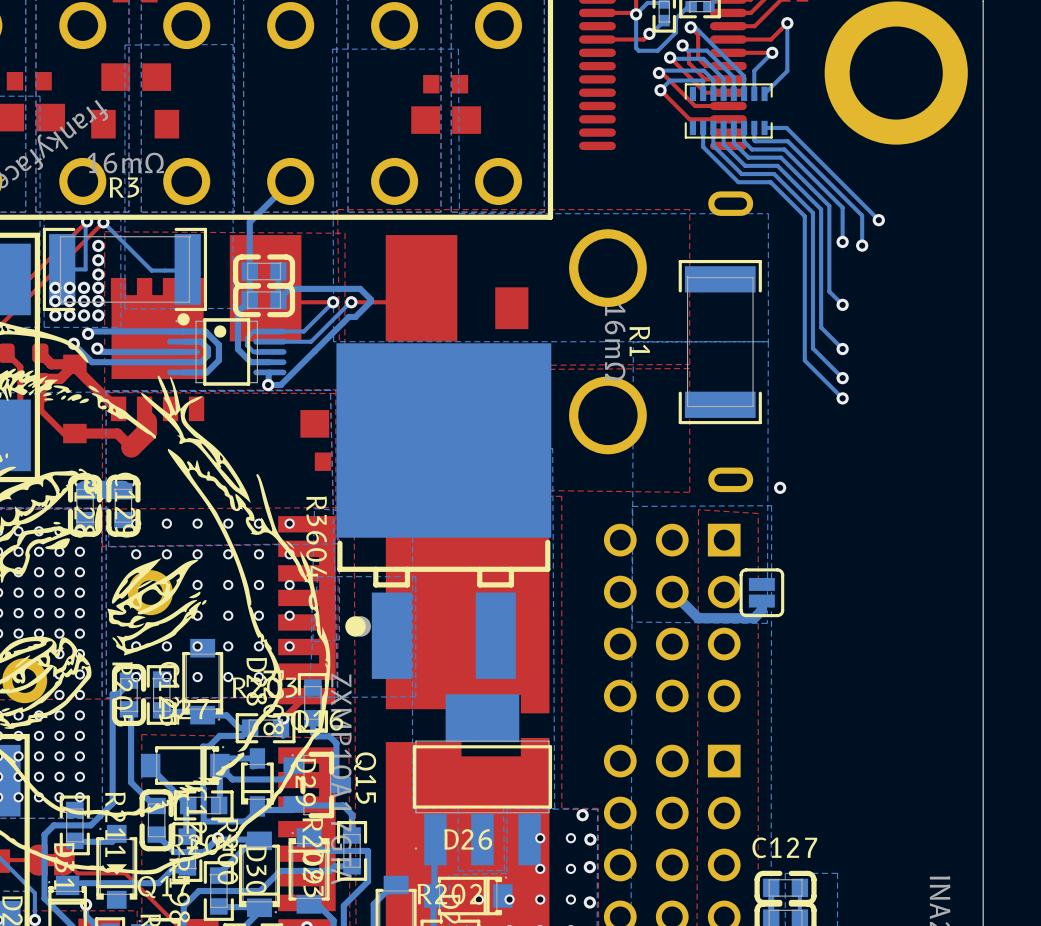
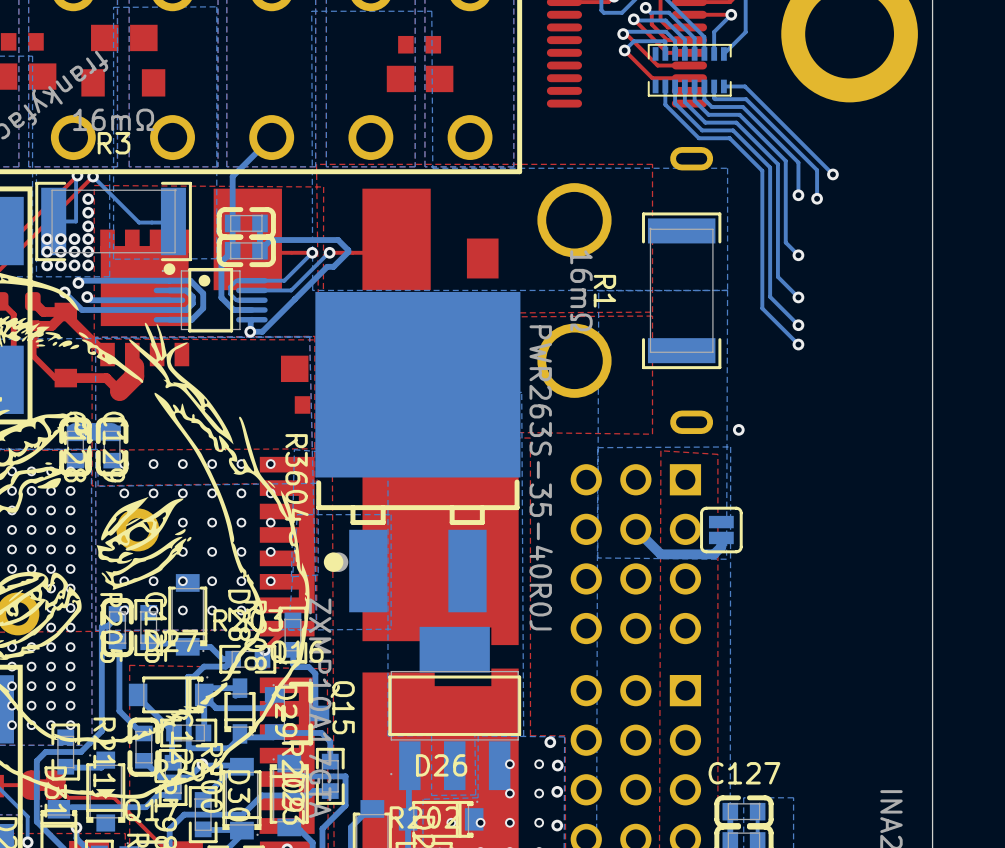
R3604 value: none -> PWR263S-35-40R0J (541, 477)

